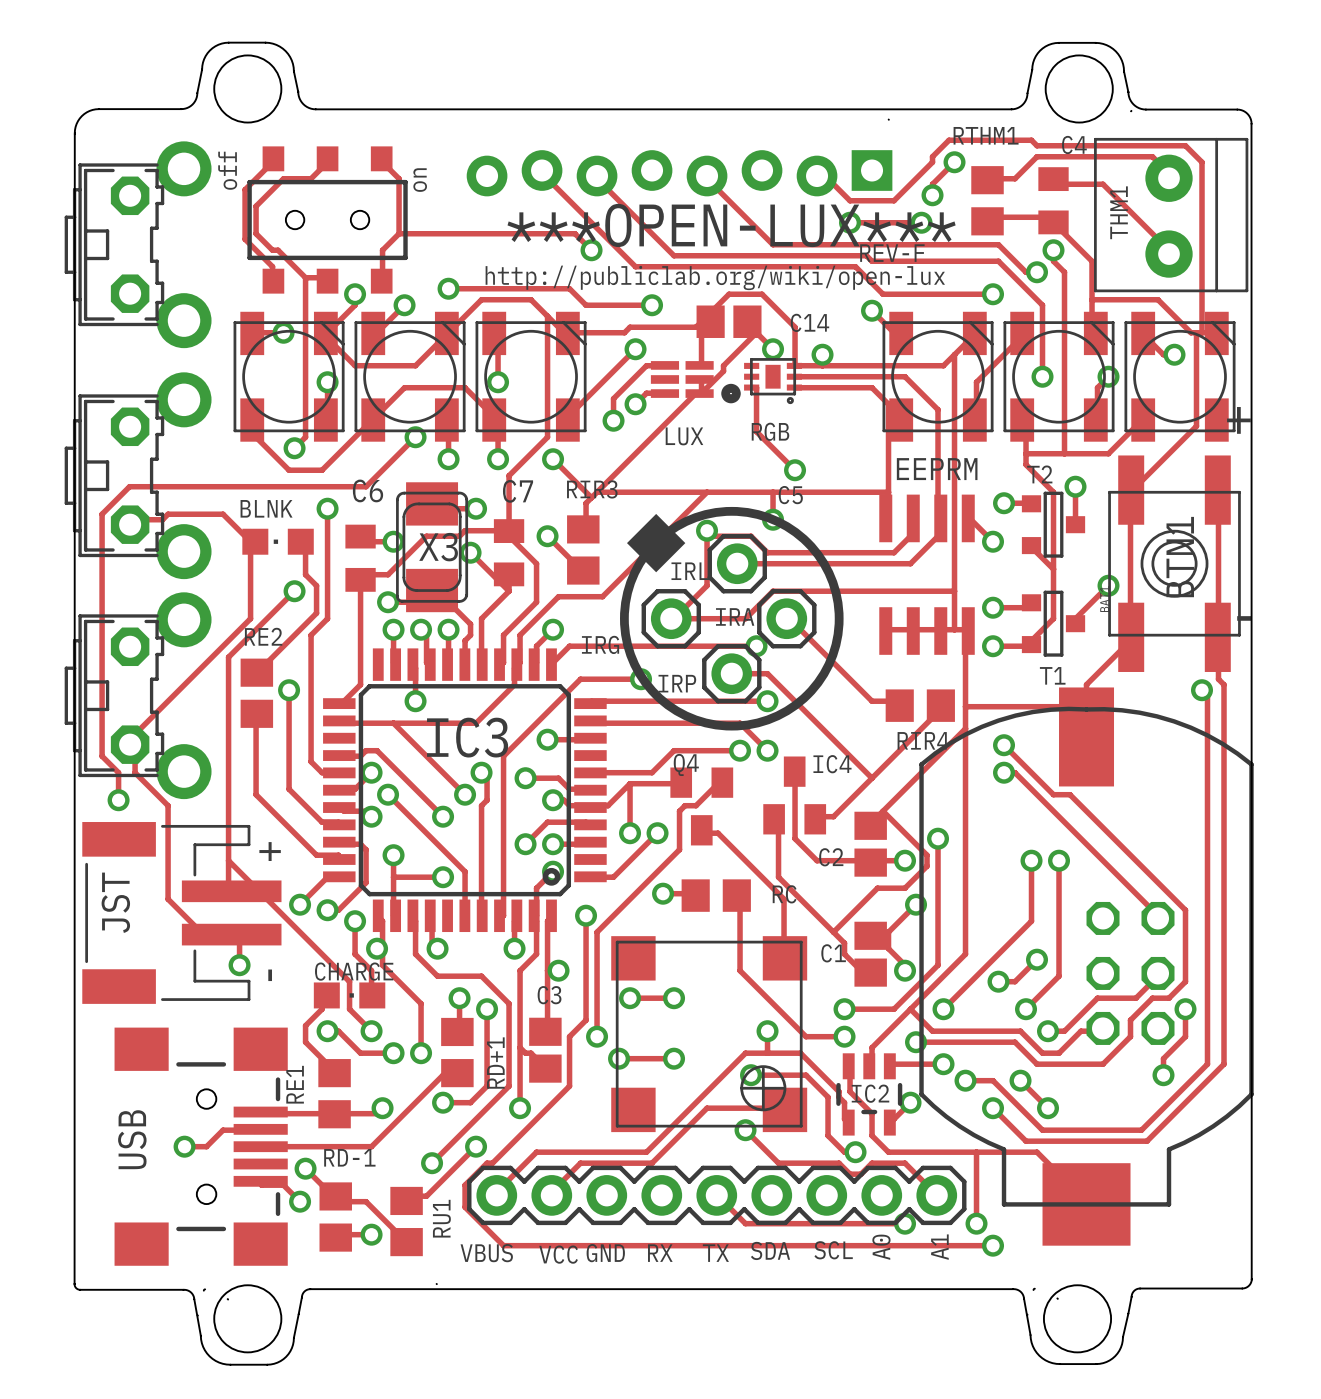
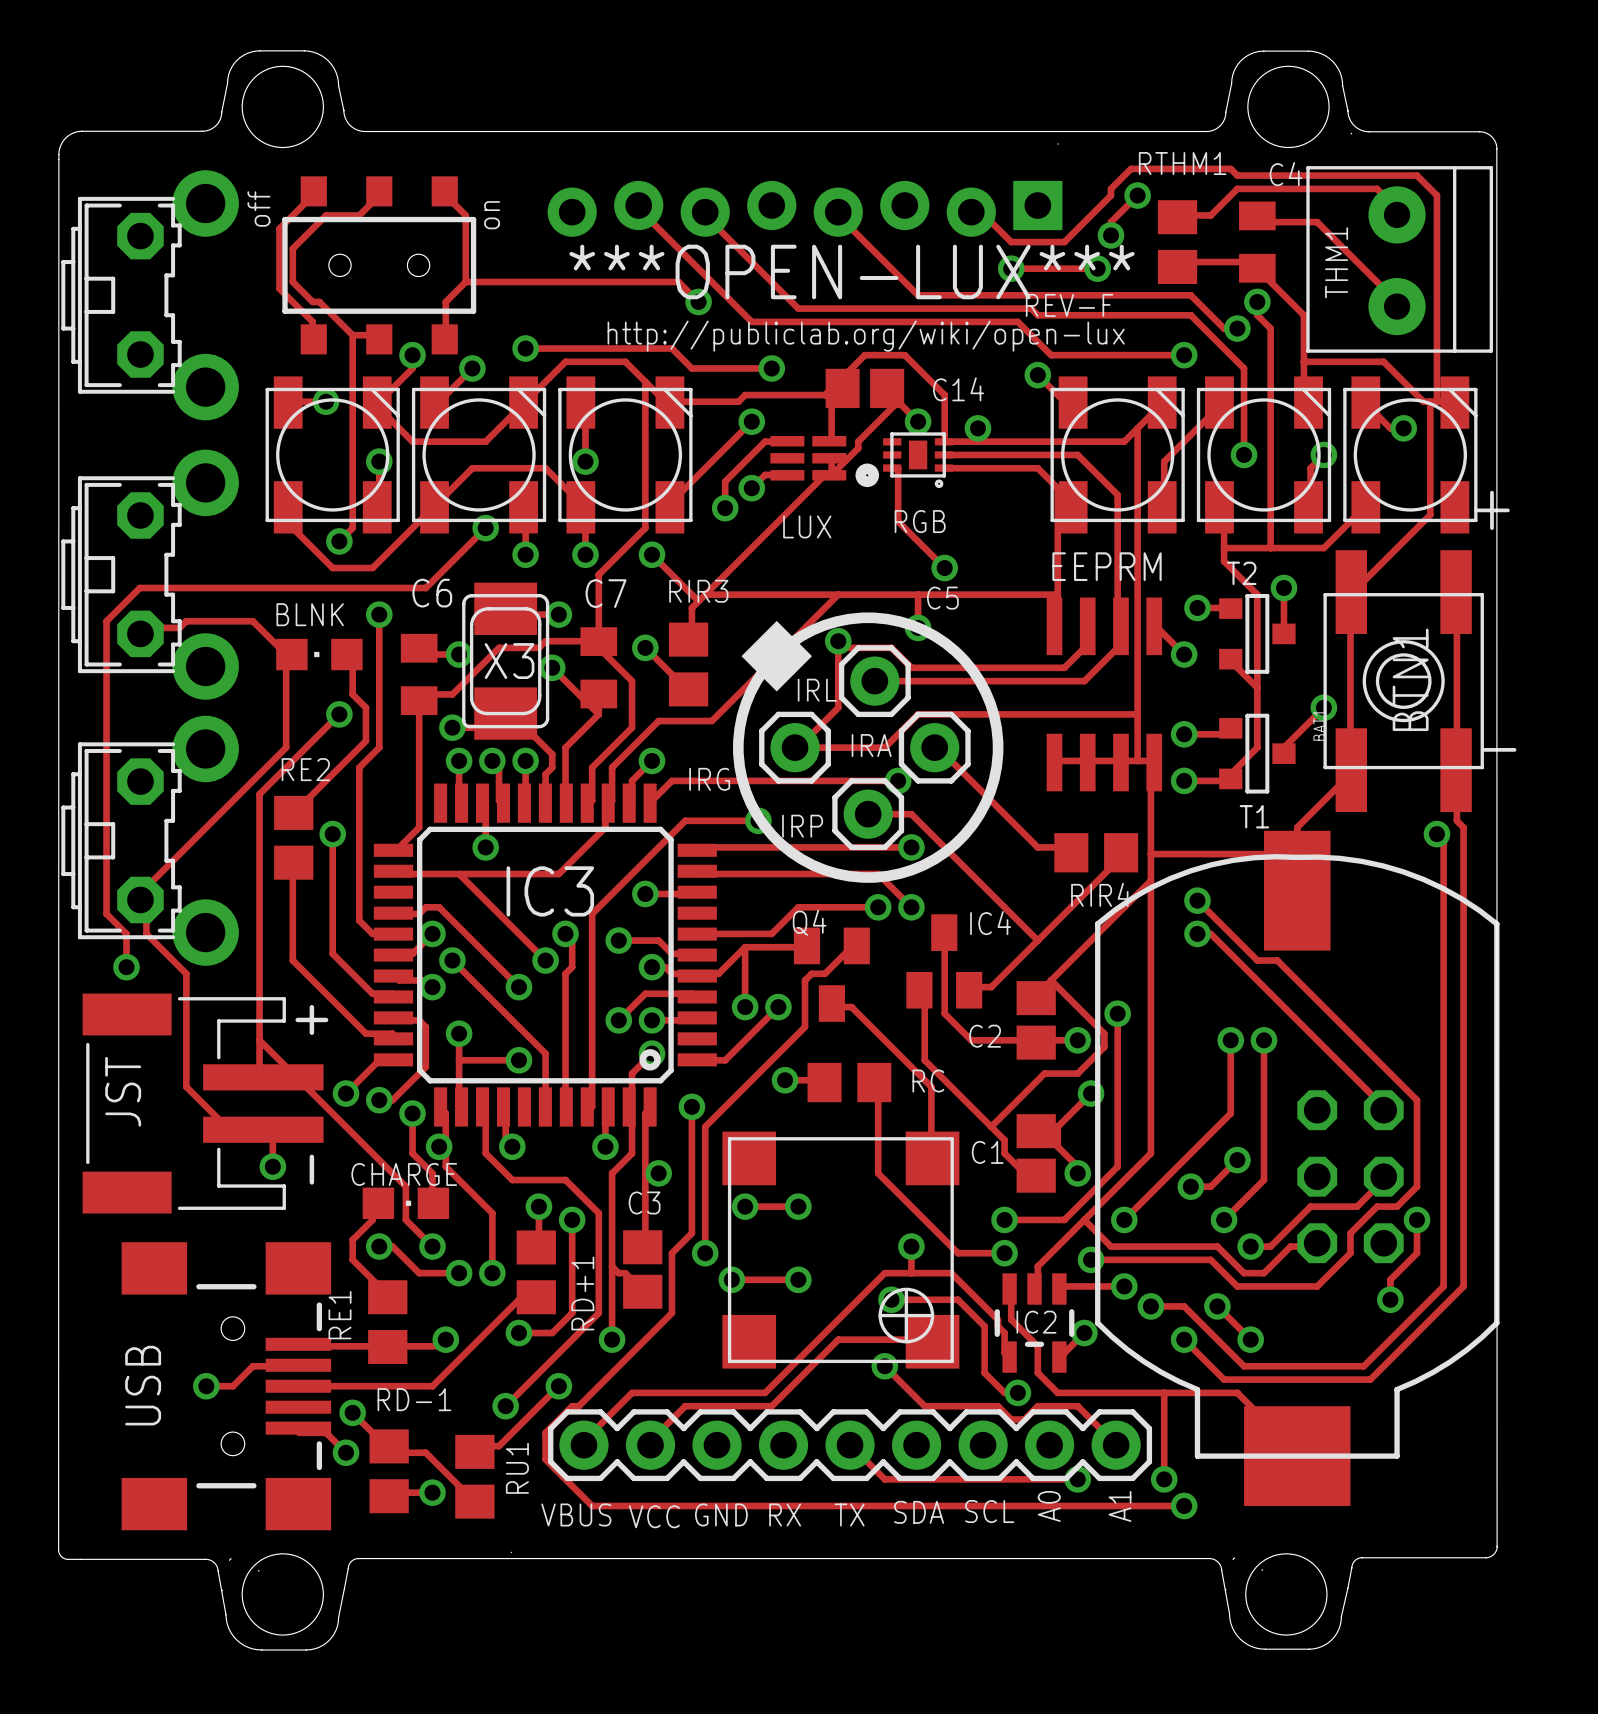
board edge: (98, 109) (89, 110) (81, 116) (76, 123) (74, 133) (74, 1283) -> (102, 131) (79, 131) (70, 134) (62, 142) (58, 154) (58, 1549) (59, 1554) (64, 1558) (80, 1559)
board edge: (74, 1284) (76, 1288) (80, 1289) -> none

